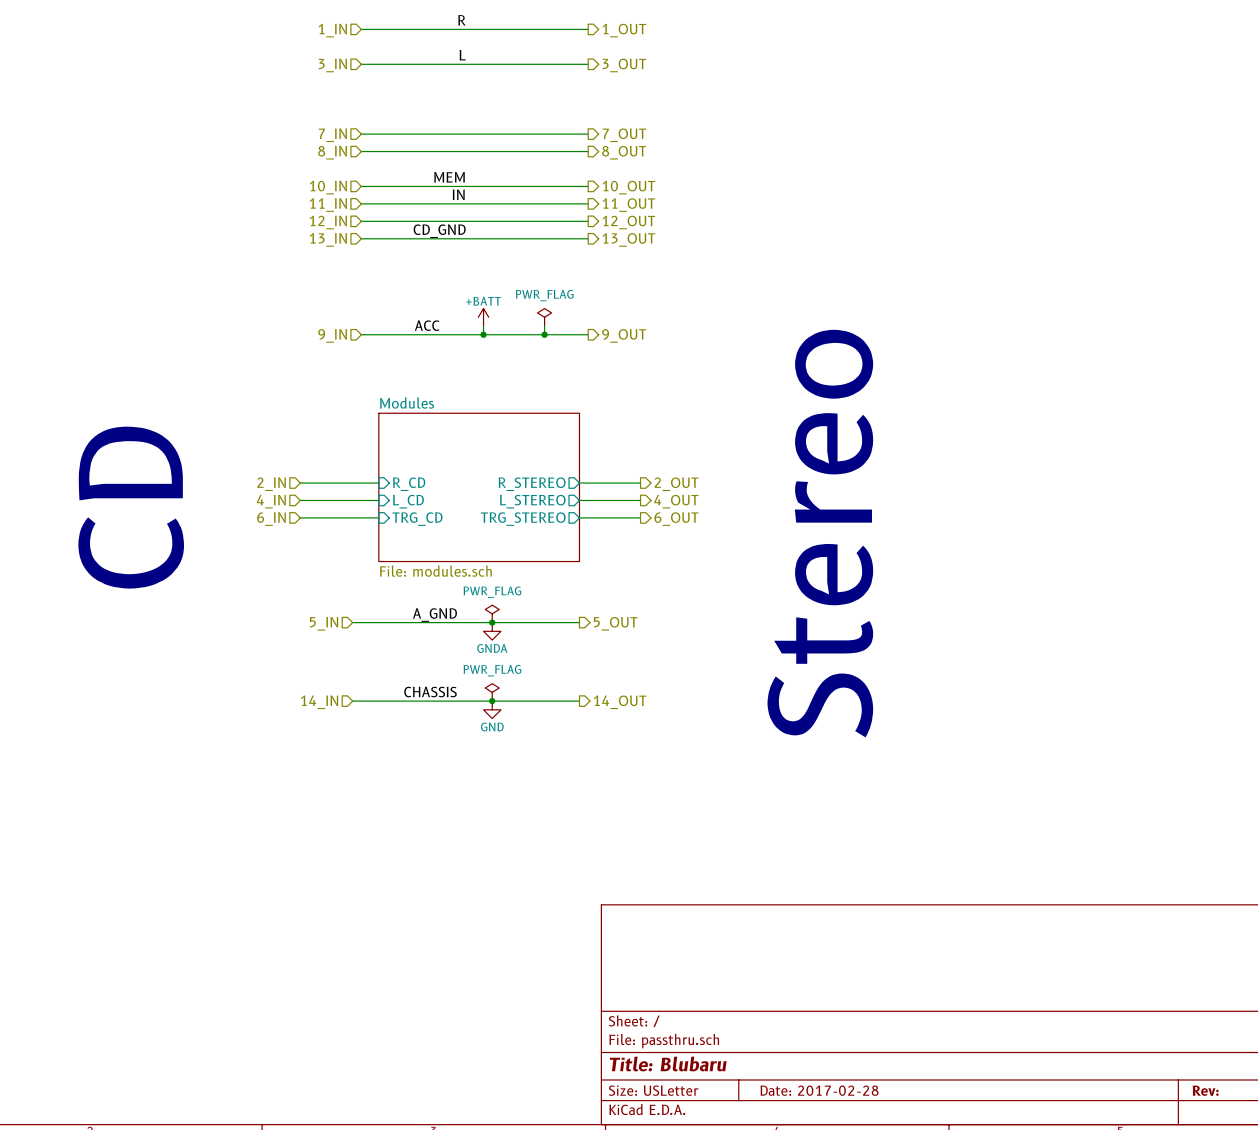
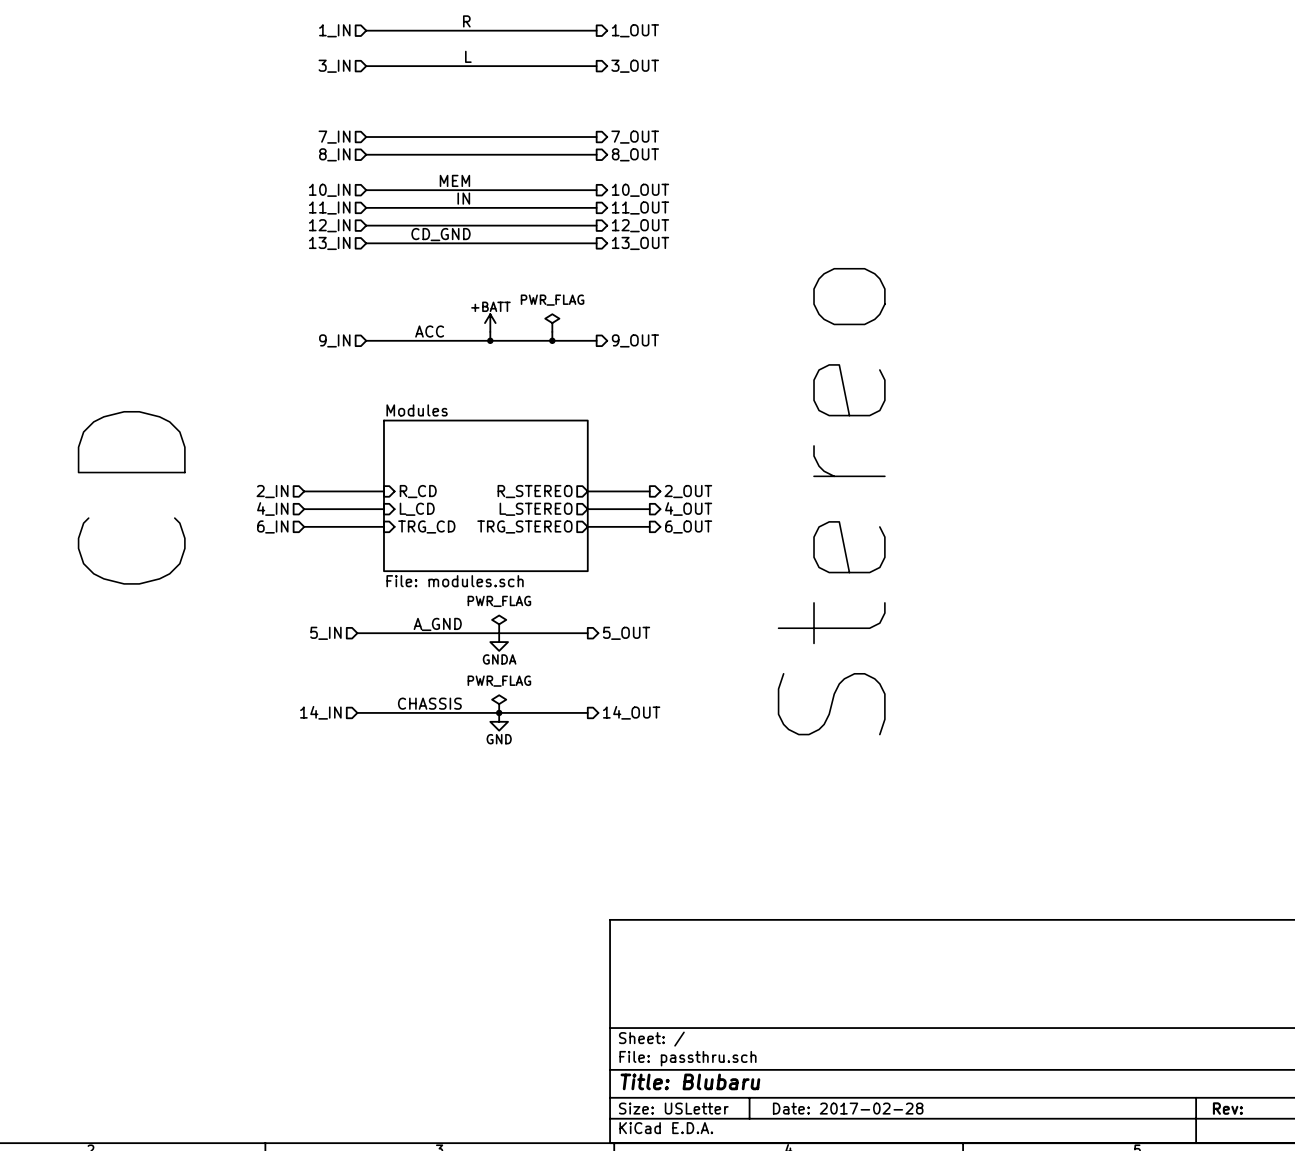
junction: (492, 622) -> none

